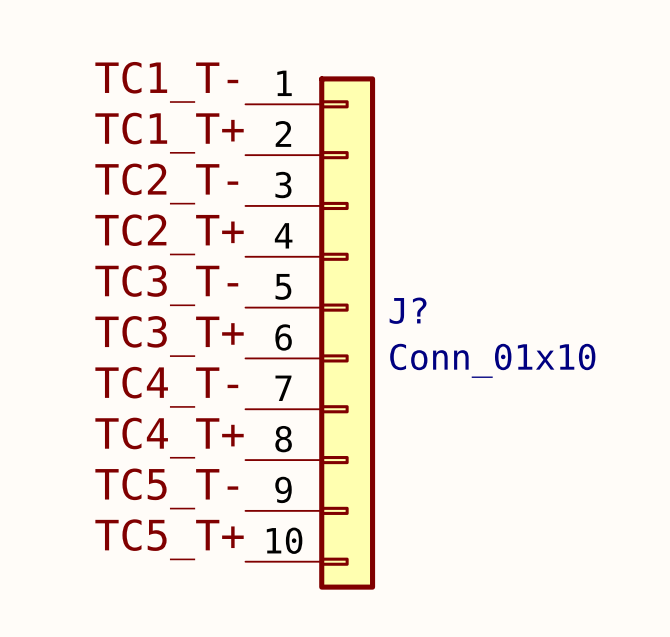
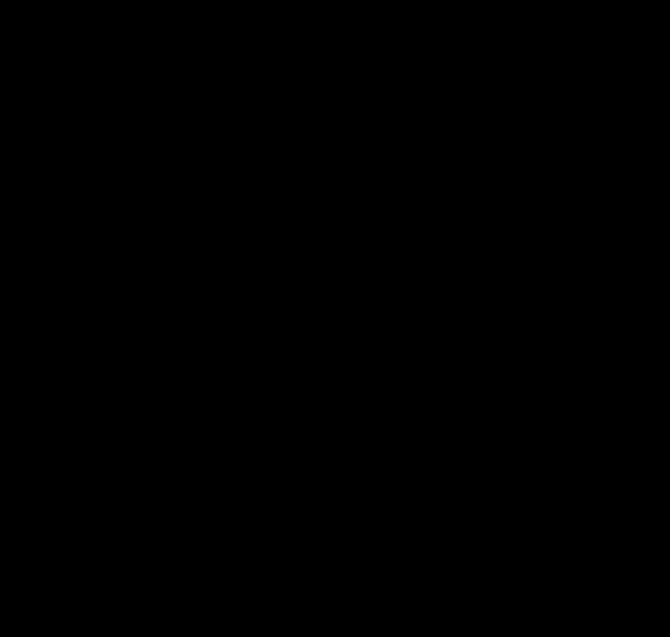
label: TC1_T- (166, 82) -> none
label: TC1_T+ (169, 133) -> none
label: TC2_T- (166, 184) -> none
label: TC2_T+ (169, 234) -> none
label: TC3_T- (166, 285) -> none
J?: Conn_01x10 (310, 333) -> none
label: TC3_T+ (169, 336) -> none
label: TC4_T- (166, 387) -> none
label: TC4_T+ (169, 438) -> none
label: TC5_T- (166, 488) -> none
label: TC5_T+ (169, 539) -> none

